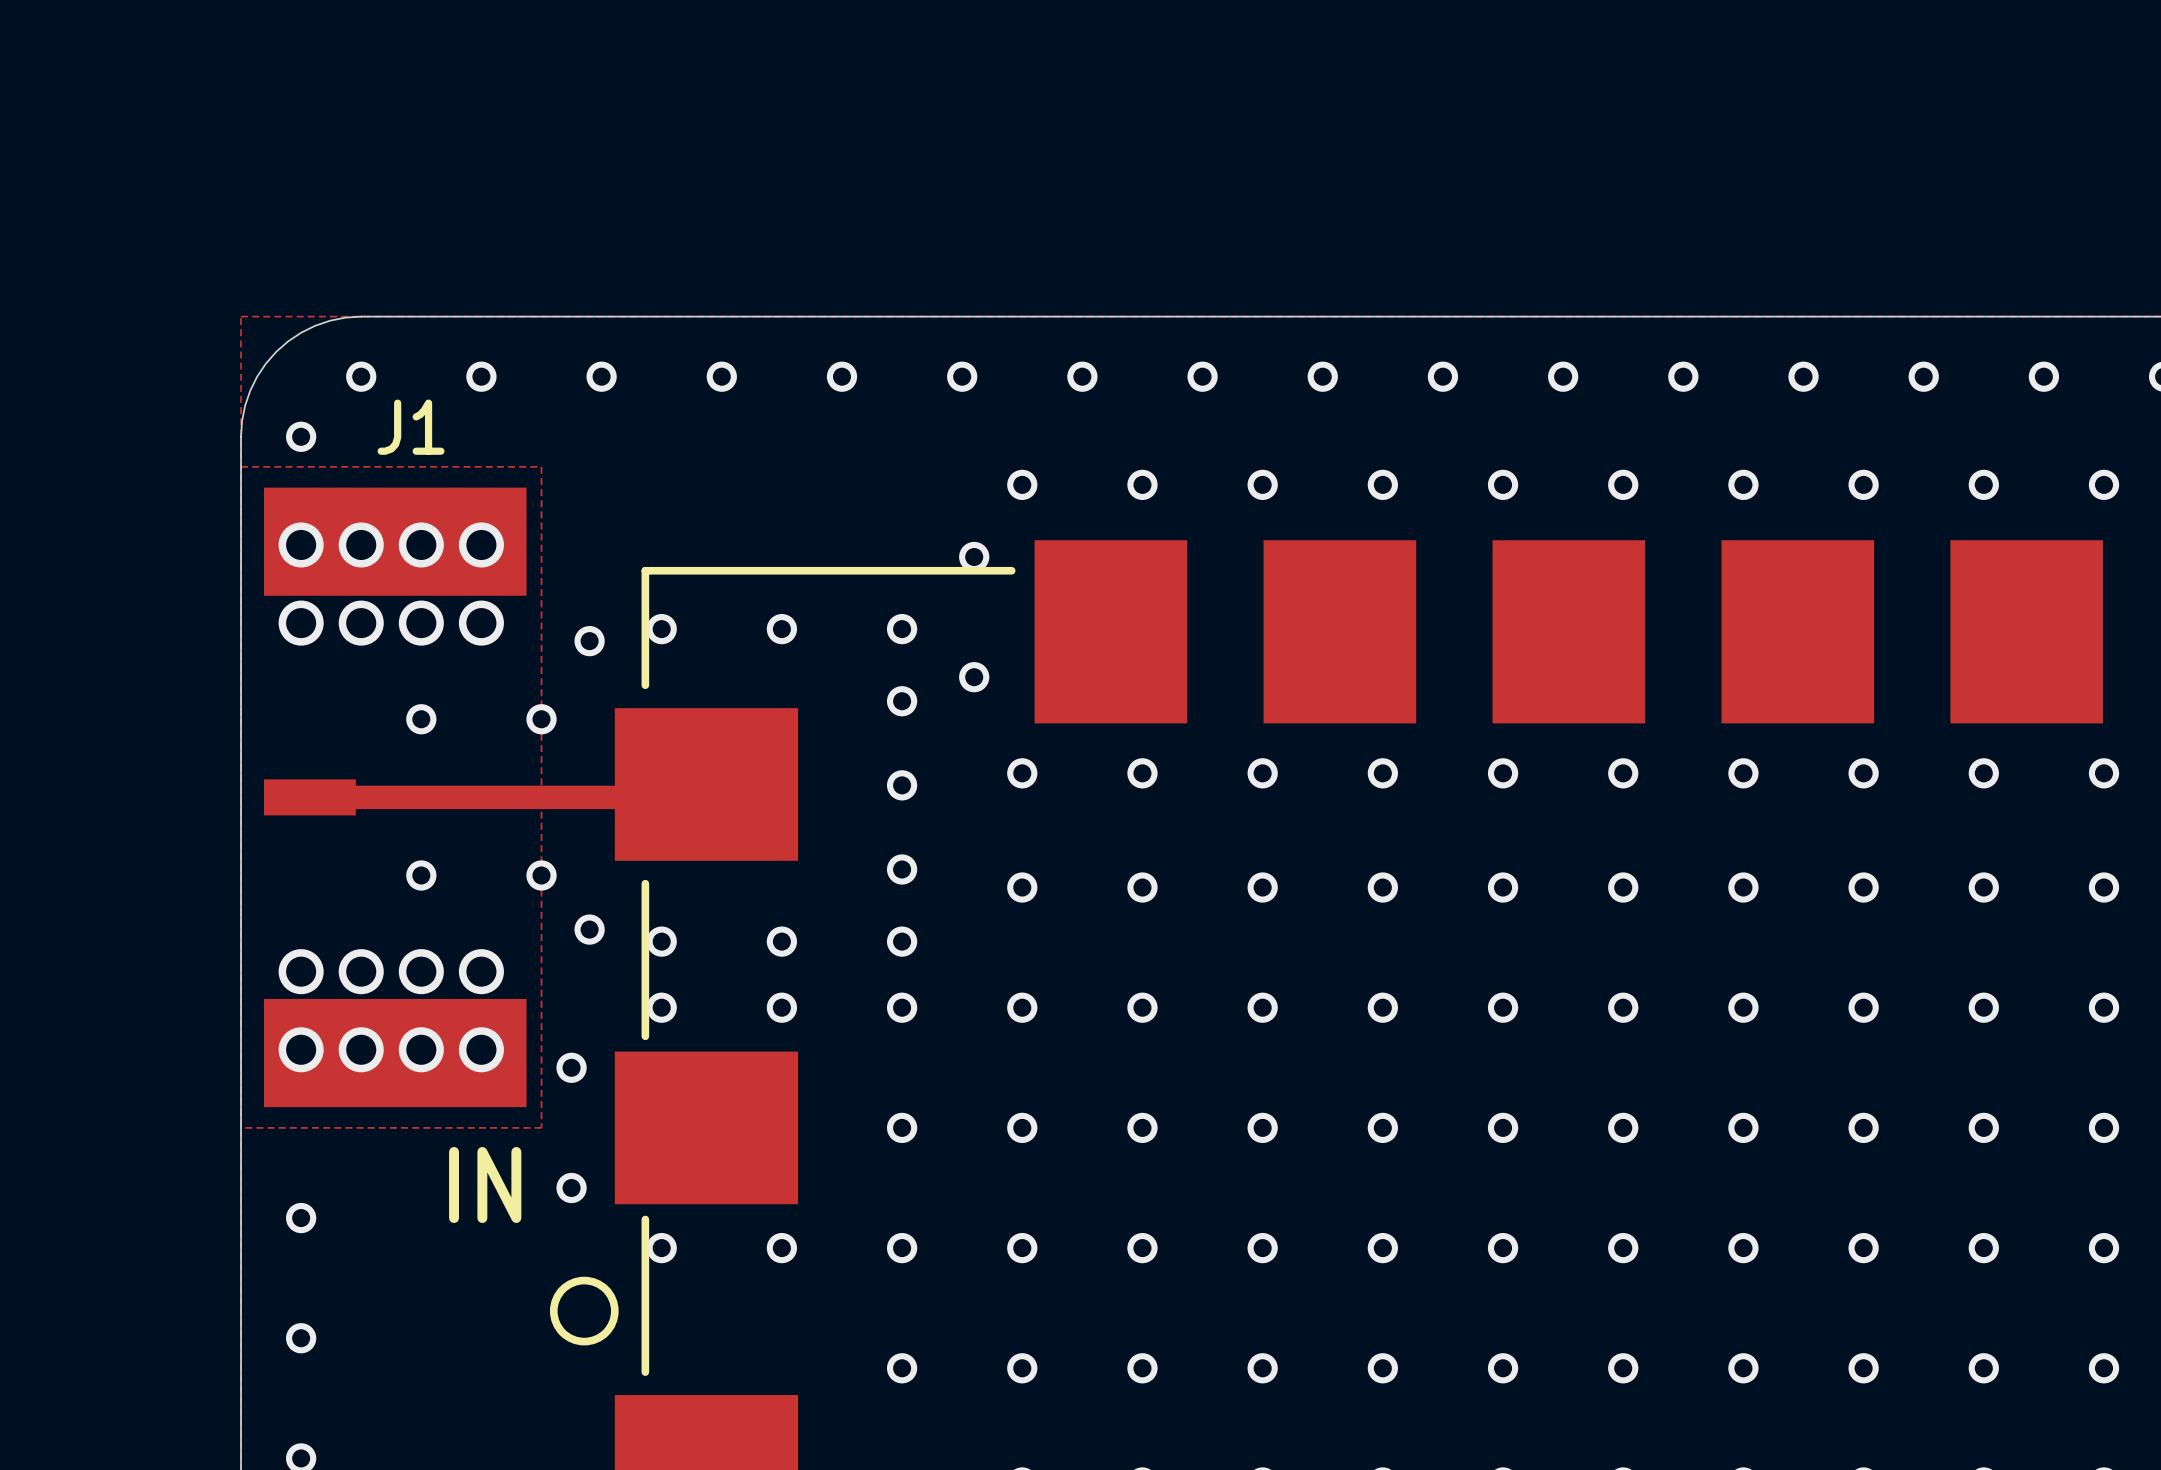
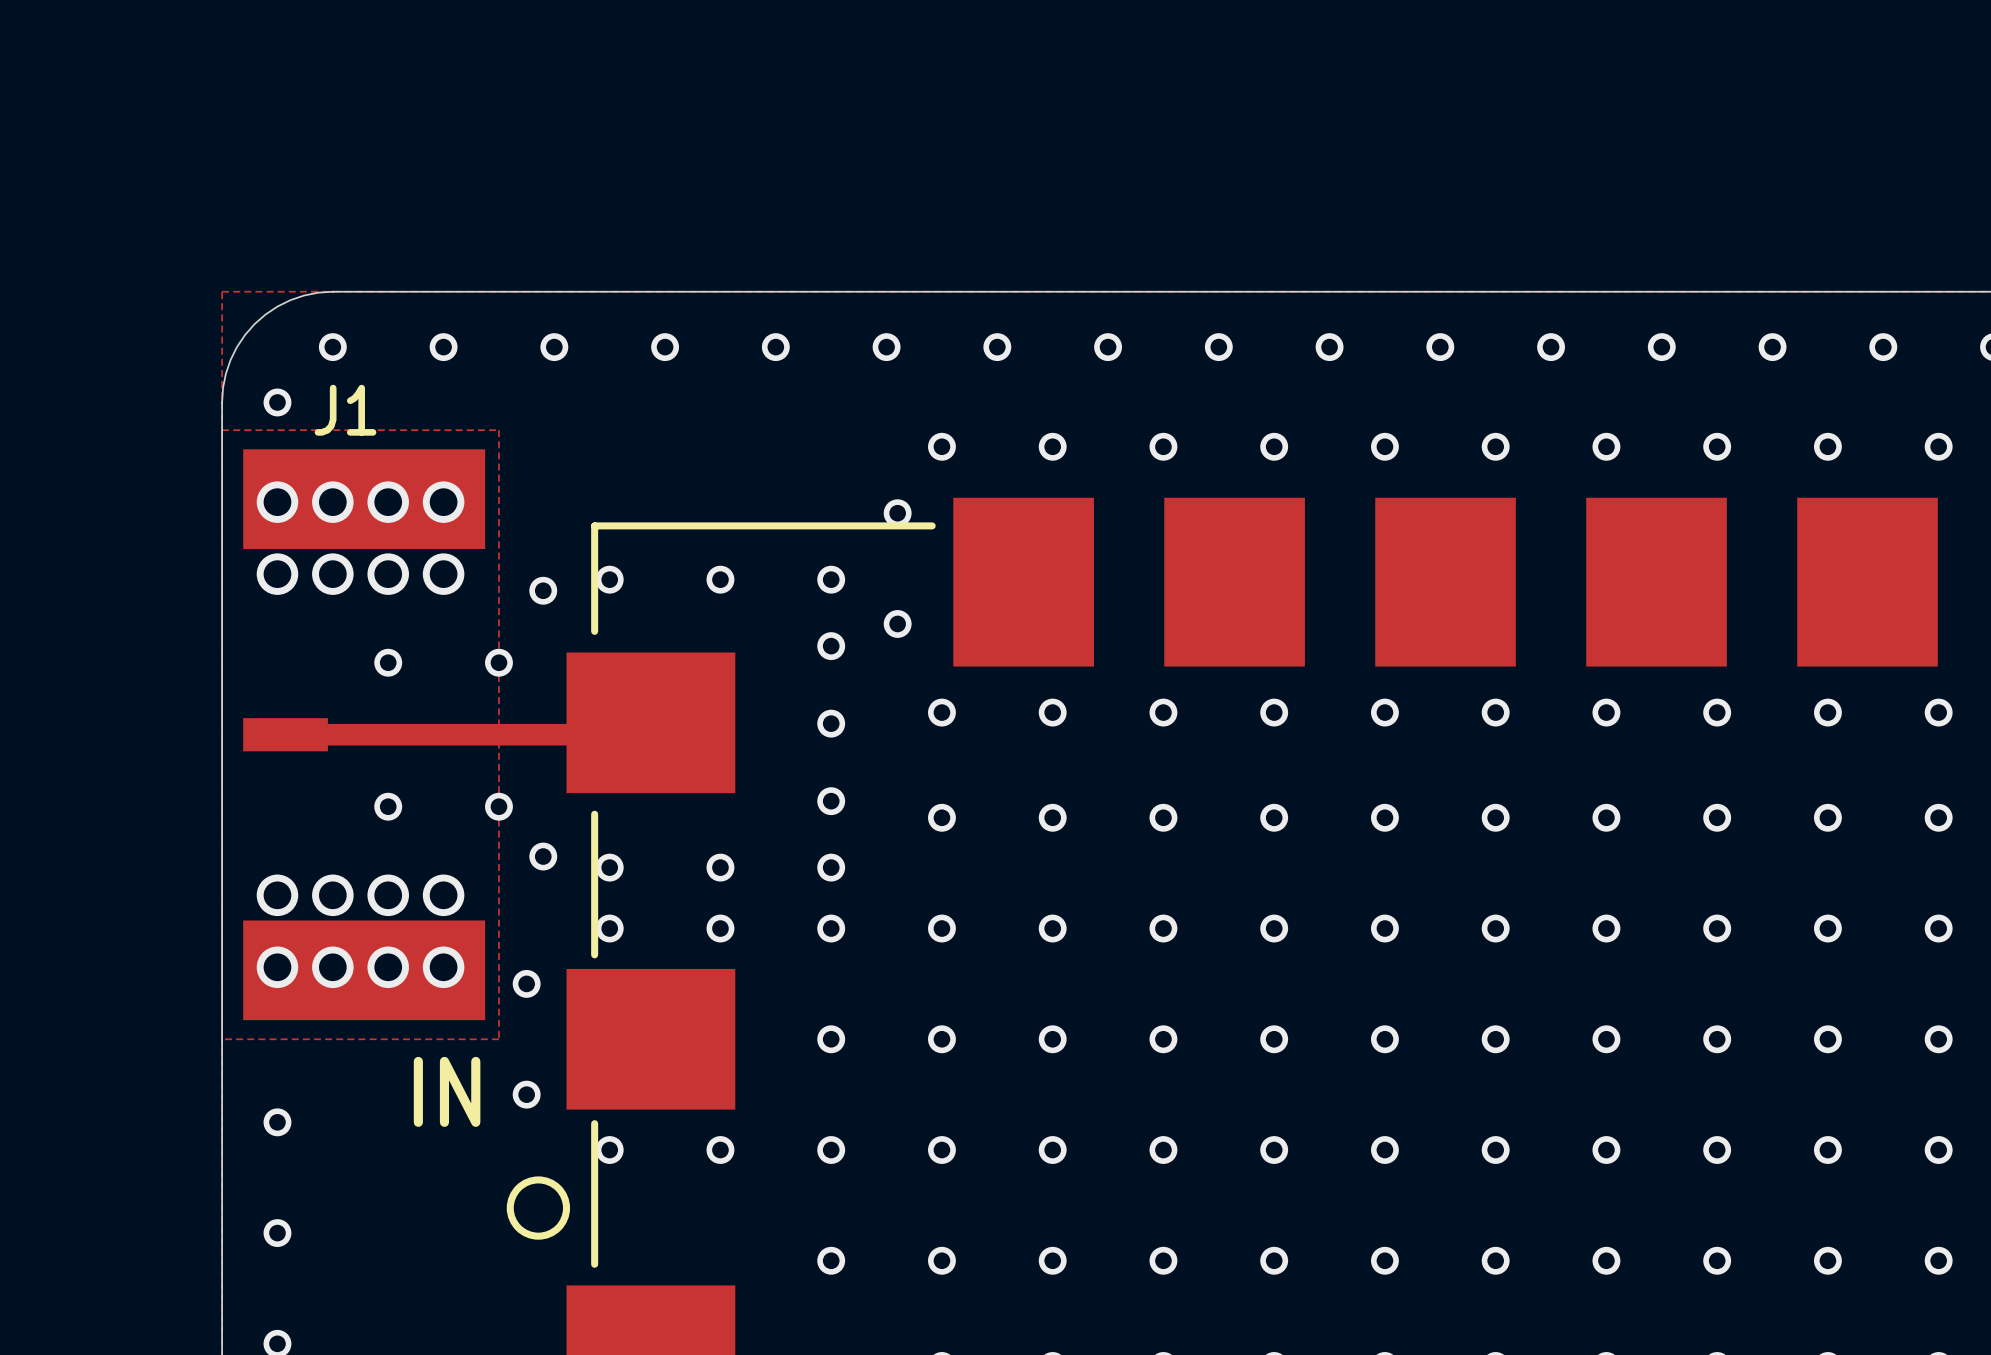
J1 name position: J1 (411, 427) -> J1 (345, 410)

